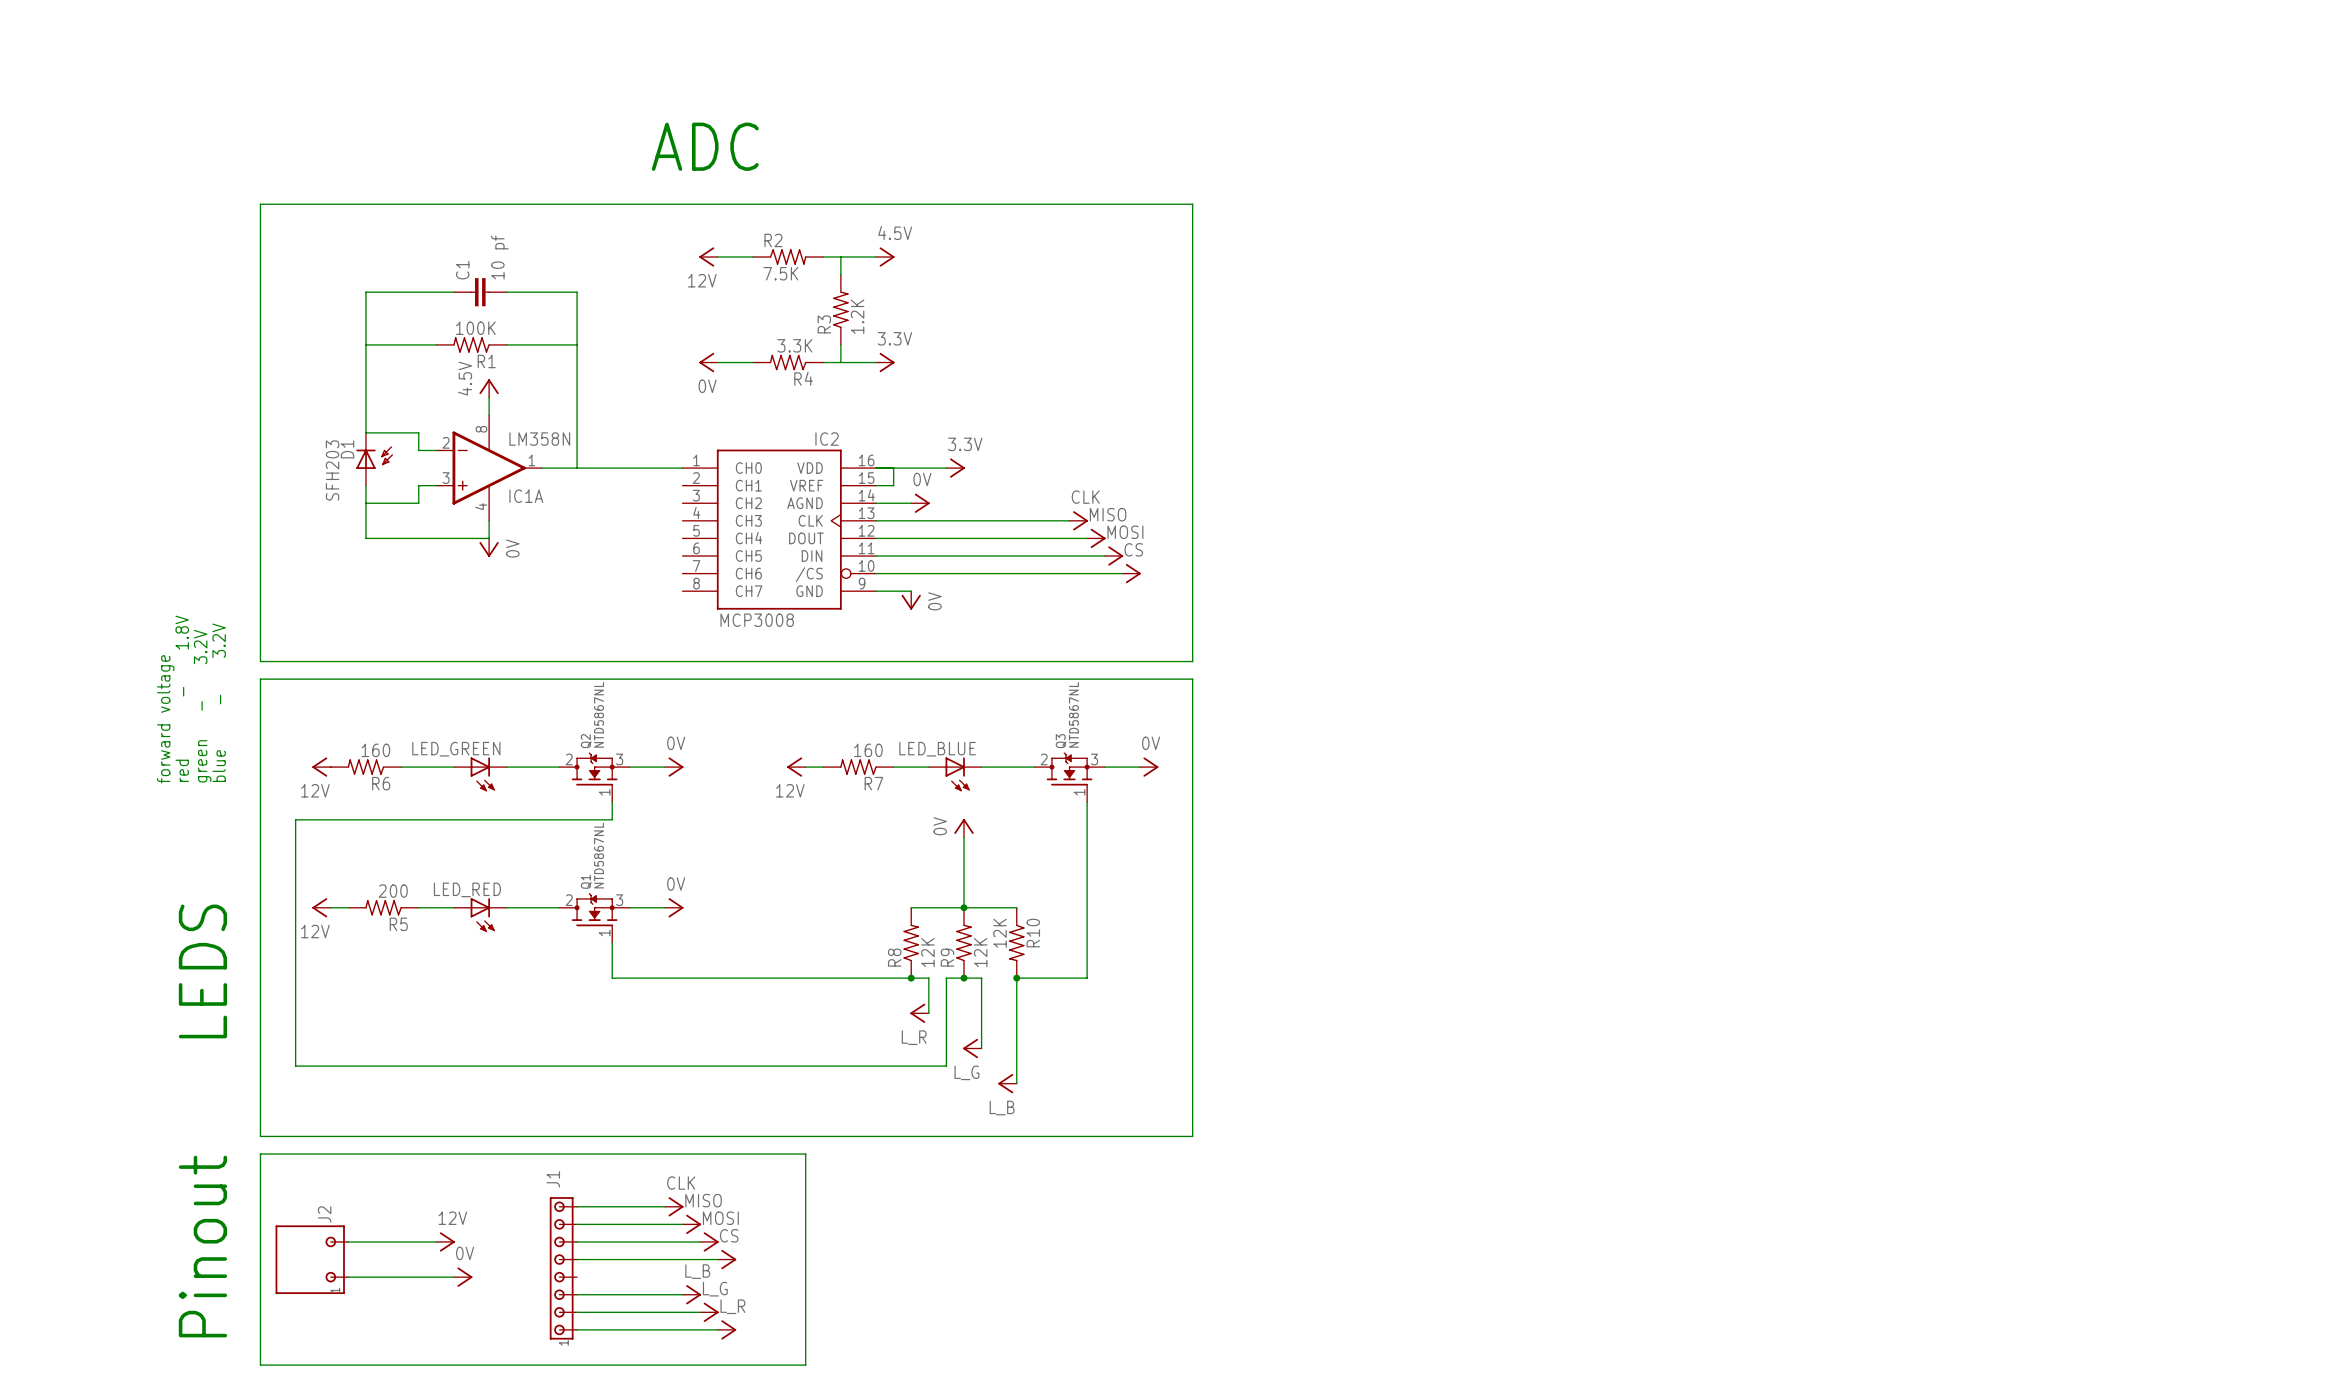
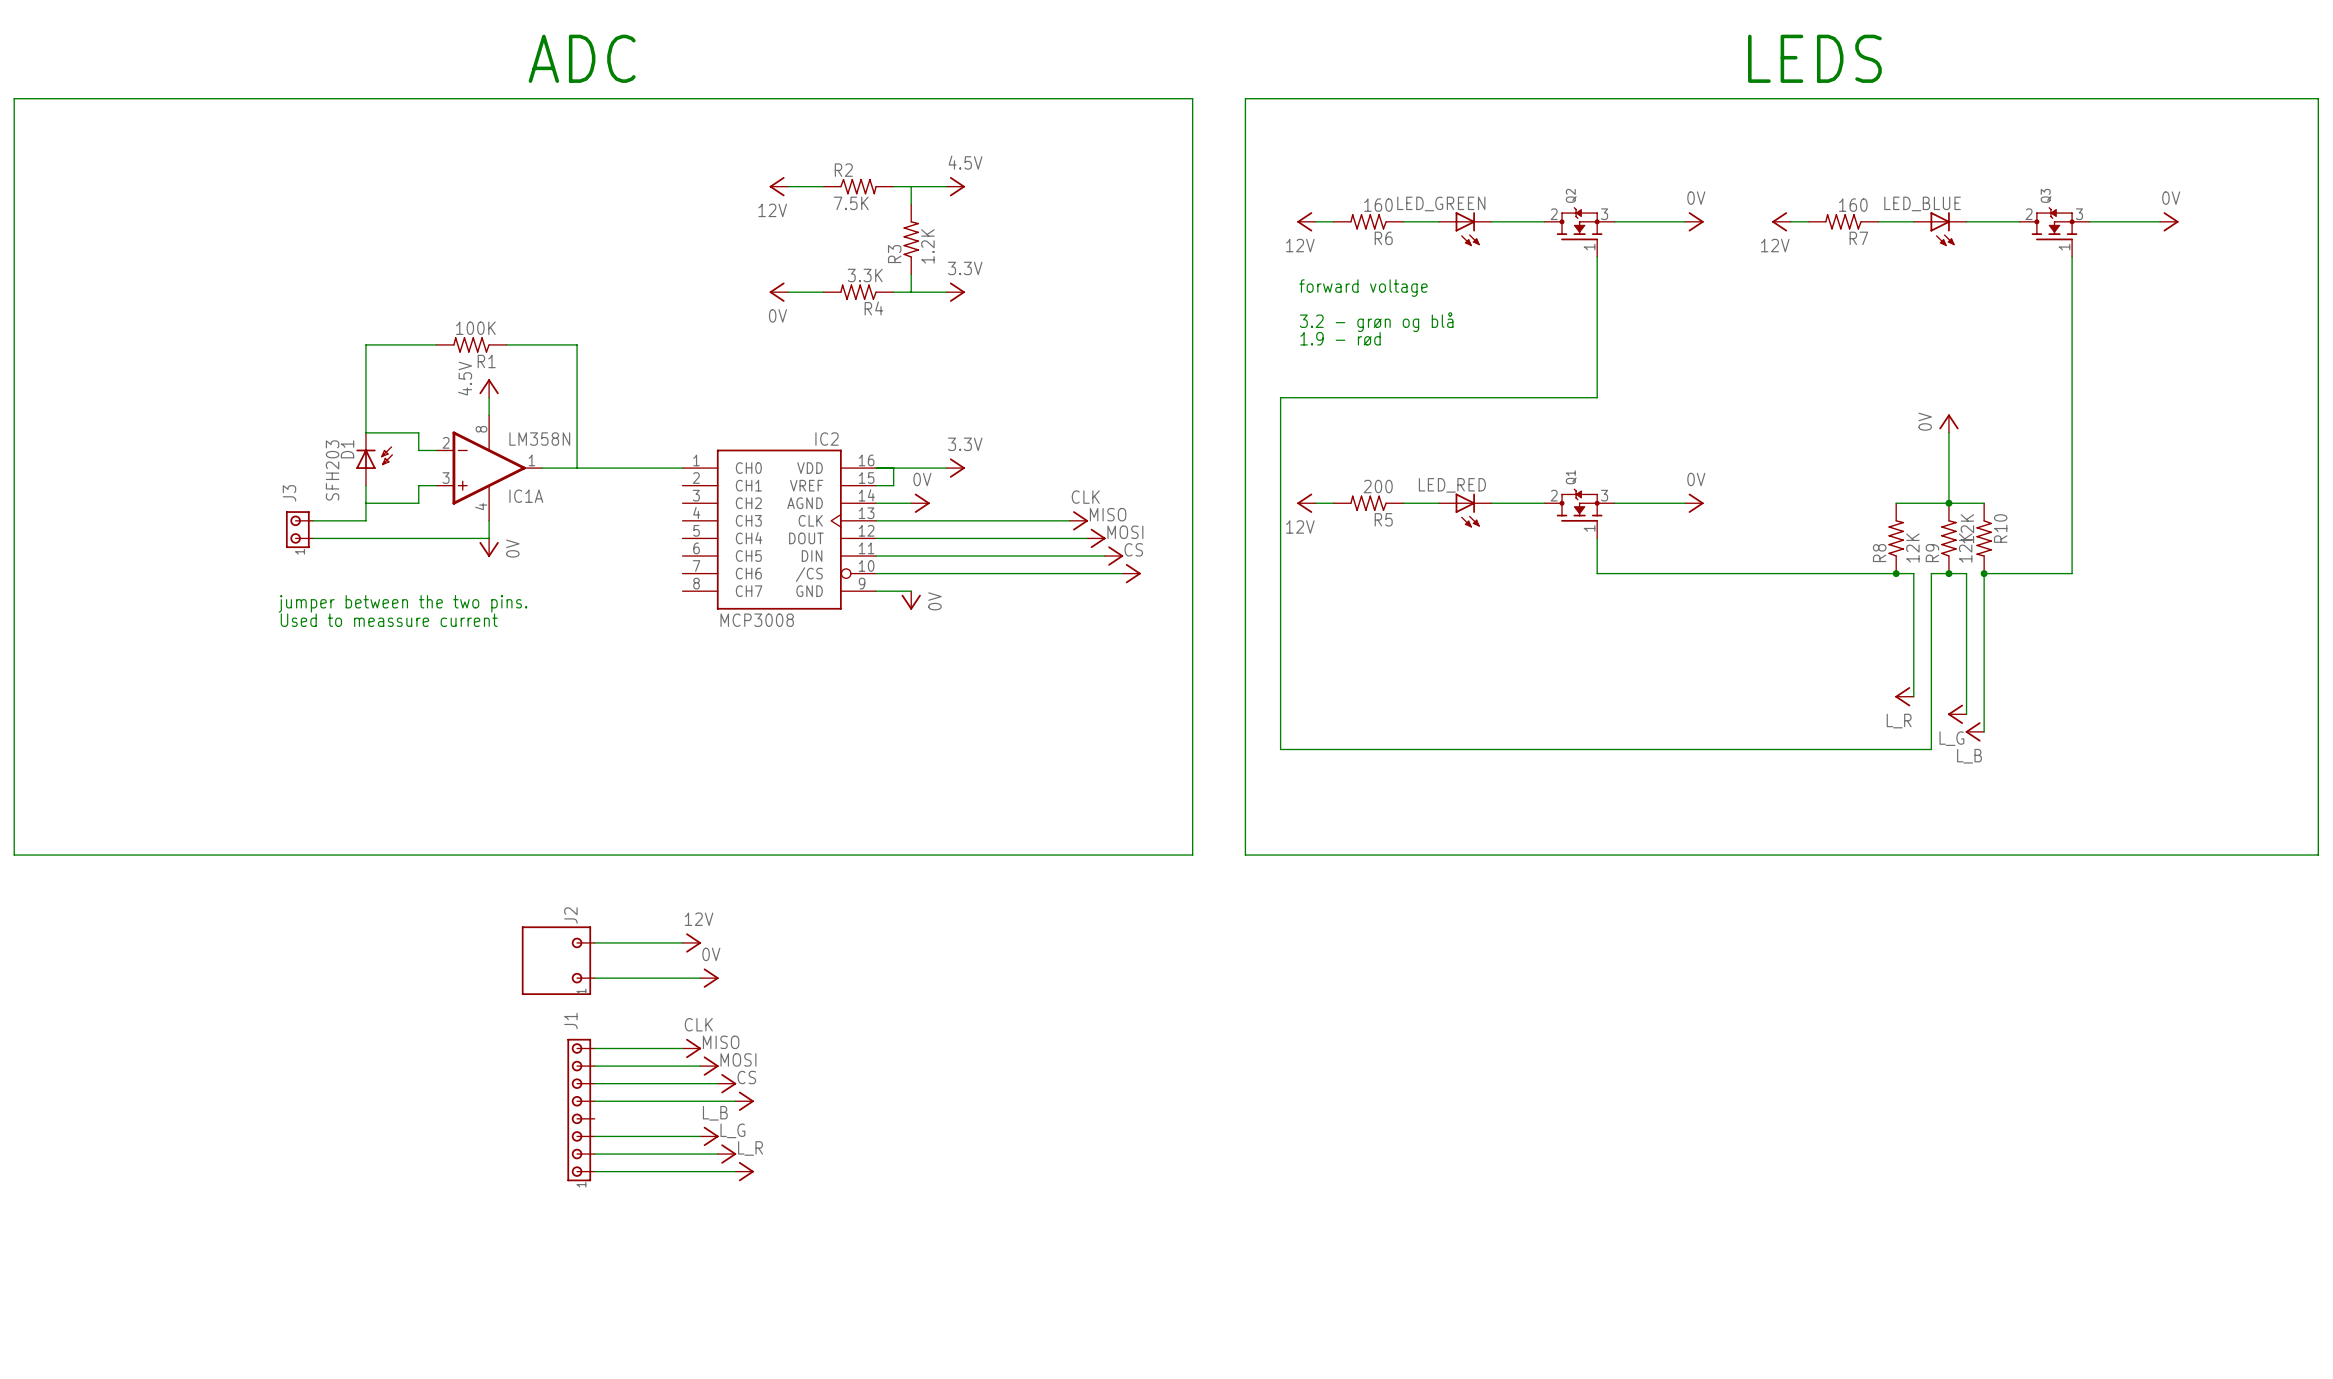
text: none -> LEDS (1814, 58)
wire: none -> (1245, 98) (2318, 98) (2318, 855) (1245, 855) (1245, 98)
text position: ADC (705, 146) -> ADC (582, 58)
wire: (1192, 204) (260, 204) (260, 661) (1192, 661) -> (1192, 204) (1192, 98) (14, 98) (14, 855) (1192, 855)
power symbol: none -> 12V (1306, 221)
wire: none -> (1315, 221) (1333, 221)
wire: none -> (1403, 221) (1438, 221)
wire: none -> (1491, 221) (1544, 221)
wire: none -> (1614, 221) (1685, 221)
power symbol: none -> 0V (1694, 221)
power symbol: none -> 12V (1781, 221)
wire: none -> (1790, 221) (1808, 221)
wire: none -> (1878, 221) (1913, 221)
wire: none -> (1966, 221) (2019, 221)
wire: none -> (2089, 221) (2160, 221)
power symbol: none -> 0V (2169, 221)
LED_GREEN: none -> (1465, 229)
LED_BLUE: none -> (1940, 229)
power symbol position: 12V (708, 257) -> 12V (778, 186)
wire: (717, 257) (752, 257) -> (788, 186) (823, 186)
R2 position: (788, 257) -> (858, 186)
wire: (823, 257) (876, 257) -> (893, 186) (946, 186)
wire: (840, 257) (840, 274) -> (911, 186) (911, 204)
power symbol position: 4.5V (885, 257) -> 4.5V (955, 186)
wire: none -> (1597, 257) (1597, 397) (1280, 397) (1280, 749) (1931, 749) (1931, 573) (1966, 573) (1966, 714)
wire: none -> (2072, 257) (2072, 573) (1984, 573) (1984, 731)
text: none -> forward voltage (1363, 288)
wire: (453, 292) (365, 292) (365, 344) -> none
C1: 10 pf (480, 292) -> none
wire: (506, 292) (577, 292) (577, 344) -> none
R3 position: (840, 309) -> (911, 239)
text: none -> 3.2 - grøn og blå (1376, 322)
text: none -> 1.9 - rød (1340, 338)
wire: (840, 344) (840, 362) -> (911, 274) (911, 292)
power symbol position: 0V (708, 362) -> 0V (778, 292)
wire: (717, 362) (752, 362) -> (788, 292) (823, 292)
R4 position: (788, 362) -> (858, 292)
wire: (823, 362) (876, 362) -> (893, 292) (946, 292)
power symbol position: 3.3V (885, 362) -> 3.3V (955, 292)
power symbol: none -> 0V (1948, 423)
wire: none -> (1948, 432) (1948, 503)
power symbol: none -> 12V (1306, 503)
wire: none -> (1315, 503) (1333, 503)
wire: none -> (1403, 503) (1438, 503)
wire: none -> (1491, 503) (1544, 503)
wire: none -> (1614, 503) (1685, 503)
power symbol: none -> 0V (1694, 503)
wire: none -> (1896, 503) (1984, 503)
junction: none -> (1948, 503)
LED_RED: none -> (1465, 510)
wire: (365, 520) (365, 538) -> (365, 520) (313, 520)
J3: none -> (299, 529)
wire: none -> (313, 538) (365, 538)
wire: none -> (1597, 538) (1597, 573) (1913, 573) (1913, 696)
junction: none -> (1896, 573)
junction: none -> (1948, 573)
junction: none -> (1984, 573)
text: none -> jumper between the two pins. (402, 603)
text: none -> Used to meassure current (389, 620)
wire: (1192, 679) (260, 679) (260, 1136) (594, 1136) -> (1192, 679) (1192, 661)
power symbol: none -> L_R (1904, 696)
text: red - 1.8V (182, 698) -> none
text: blue - 3.2V (219, 702) -> none
text: green - 3.2V (202, 706) -> none
Q2 value: NTD5867NL (599, 714) -> none
Q3 value: NTD5867NL (1073, 714) -> none
power symbol: none -> L_G (1957, 714)
text: forward voltage (165, 719) -> none
power symbol: none -> L_B (1974, 731)
power symbol: 12V (321, 767) -> none
R6 position: (365, 767) -> (1368, 221)
wire: (401, 767) (453, 767) -> none
wire: (506, 767) (559, 767) -> none
wire: (629, 767) (664, 767) -> none
power symbol: 0V (674, 767) -> none
power symbol: 12V (796, 767) -> none
wire: (805, 767) (823, 767) -> none
R7 position: (858, 767) -> (1843, 221)
wire: (893, 767) (928, 767) -> none
wire: (981, 767) (1034, 767) -> none
wire: (1104, 767) (1139, 767) -> none
power symbol: 0V (1149, 767) -> none
LED_GREEN: (480, 774) -> none
LED_BLUE: (955, 774) -> none
Q2 position: (594, 777) -> (1579, 232)
Q3 position: (1069, 777) -> (2054, 232)
wire: (612, 802) (612, 819) (295, 819) (295, 1066) (594, 1066) -> none
wire: (1087, 802) (1087, 978) (1016, 978) (1016, 1083) -> none
power symbol: 0V (964, 828) -> none
wire: (964, 837) (964, 907) -> none
Q1 value: NTD5867NL (599, 855) -> none
wire: (1192, 855) (1192, 1136) (700, 1136) -> none
power symbol: 12V (321, 907) -> none
wire: (330, 907) (348, 907) -> none
R5 position: (383, 907) -> (1368, 503)
wire: (418, 907) (453, 907) -> none
wire: (506, 907) (559, 907) -> none
wire: (629, 907) (664, 907) -> none
power symbol position: 0V (674, 907) -> 0V (709, 978)
wire: (911, 907) (1016, 907) -> none
junction: (964, 907) -> none
LED_RED: (480, 915) -> none
Q1 position: (594, 918) -> (1579, 513)
wire: none -> (594, 942) (682, 942)
wire: (612, 942) (612, 978) -> (594, 978) (612, 978)
power symbol: none -> 12V (691, 942)
R8 position: (911, 942) -> (1896, 538)
R9 position: (964, 942) -> (1948, 538)
R10 position: (1016, 942) -> (1984, 538)
text: LEDS (202, 971) -> none
wire: (700, 978) (928, 978) (928, 1013) -> none
junction: (911, 978) -> none
junction: (964, 978) -> none
junction: (1016, 978) -> none
power symbol: L_R (919, 1013) -> none
power symbol: L_G (972, 1048) -> none
wire: (981, 1048) (981, 978) (946, 978) (946, 1066) (700, 1066) -> none
power symbol: L_B (1007, 1083) -> none
power symbol: none -> L_B (709, 1136)
wire: (594, 1154) (260, 1154) (260, 1365) (805, 1365) (805, 1154) (717, 1154) -> none
power symbol: none -> L_G (726, 1154)
power symbol: none -> L_R (744, 1171)
wire: (577, 1206) (664, 1206) -> (594, 1048) (682, 1048)
power symbol position: CLK (674, 1206) -> CLK (691, 1048)
wire: (577, 1224) (682, 1224) -> none
power symbol position: MISO (691, 1224) -> MISO (709, 1066)
wire: (348, 1241) (436, 1241) -> none
power symbol: 12V (445, 1241) -> none
wire: (577, 1241) (700, 1241) -> (594, 1083) (717, 1083)
power symbol position: MOSI (709, 1241) -> MOSI (726, 1083)
text: Pinout (202, 1246) -> none
J2 position: (311, 1259) -> (558, 960)
wire: (577, 1259) (717, 1259) -> (594, 1101) (735, 1101)
power symbol position: CS (726, 1259) -> CS (744, 1101)
J1 position: (563, 1268) -> (581, 1110)
wire: (348, 1277) (453, 1277) -> none
power symbol: 0V (463, 1277) -> none
wire: (577, 1294) (682, 1294) -> none
power symbol: L_B (691, 1294) -> none
wire: (577, 1312) (700, 1312) -> none
power symbol: L_G (709, 1312) -> none
wire: (577, 1329) (717, 1329) -> (594, 1171) (735, 1171)
power symbol: L_R (726, 1329) -> none

